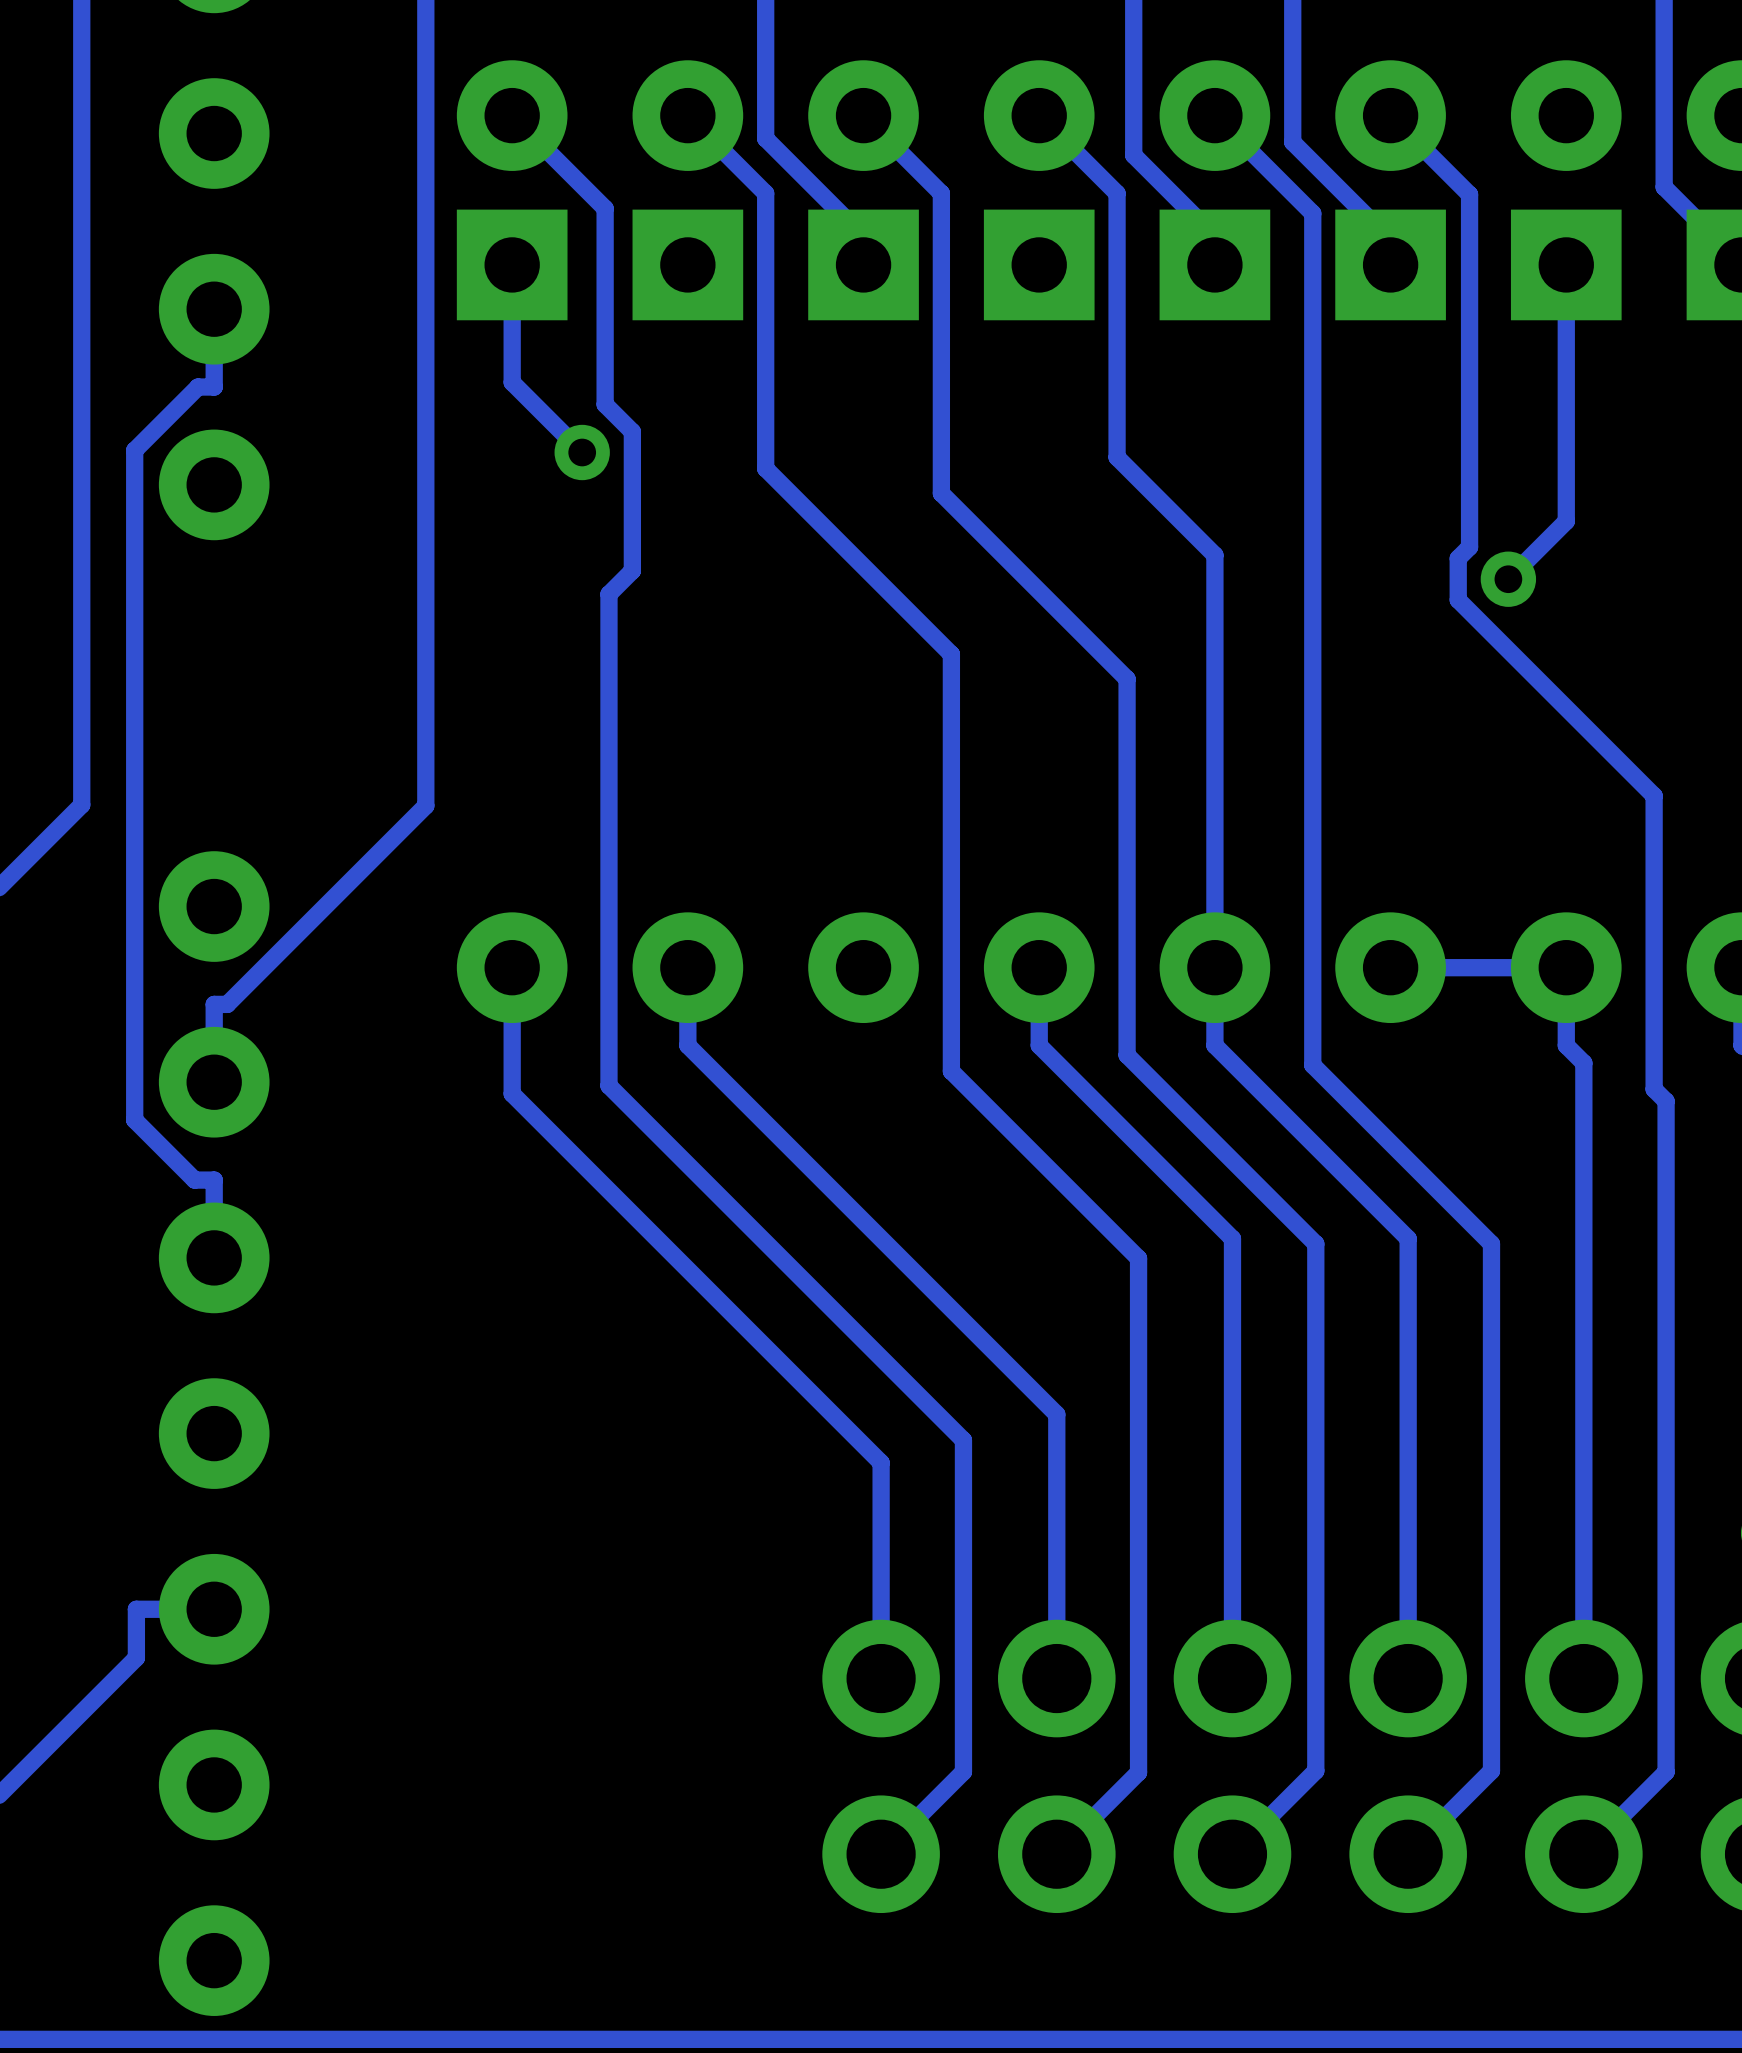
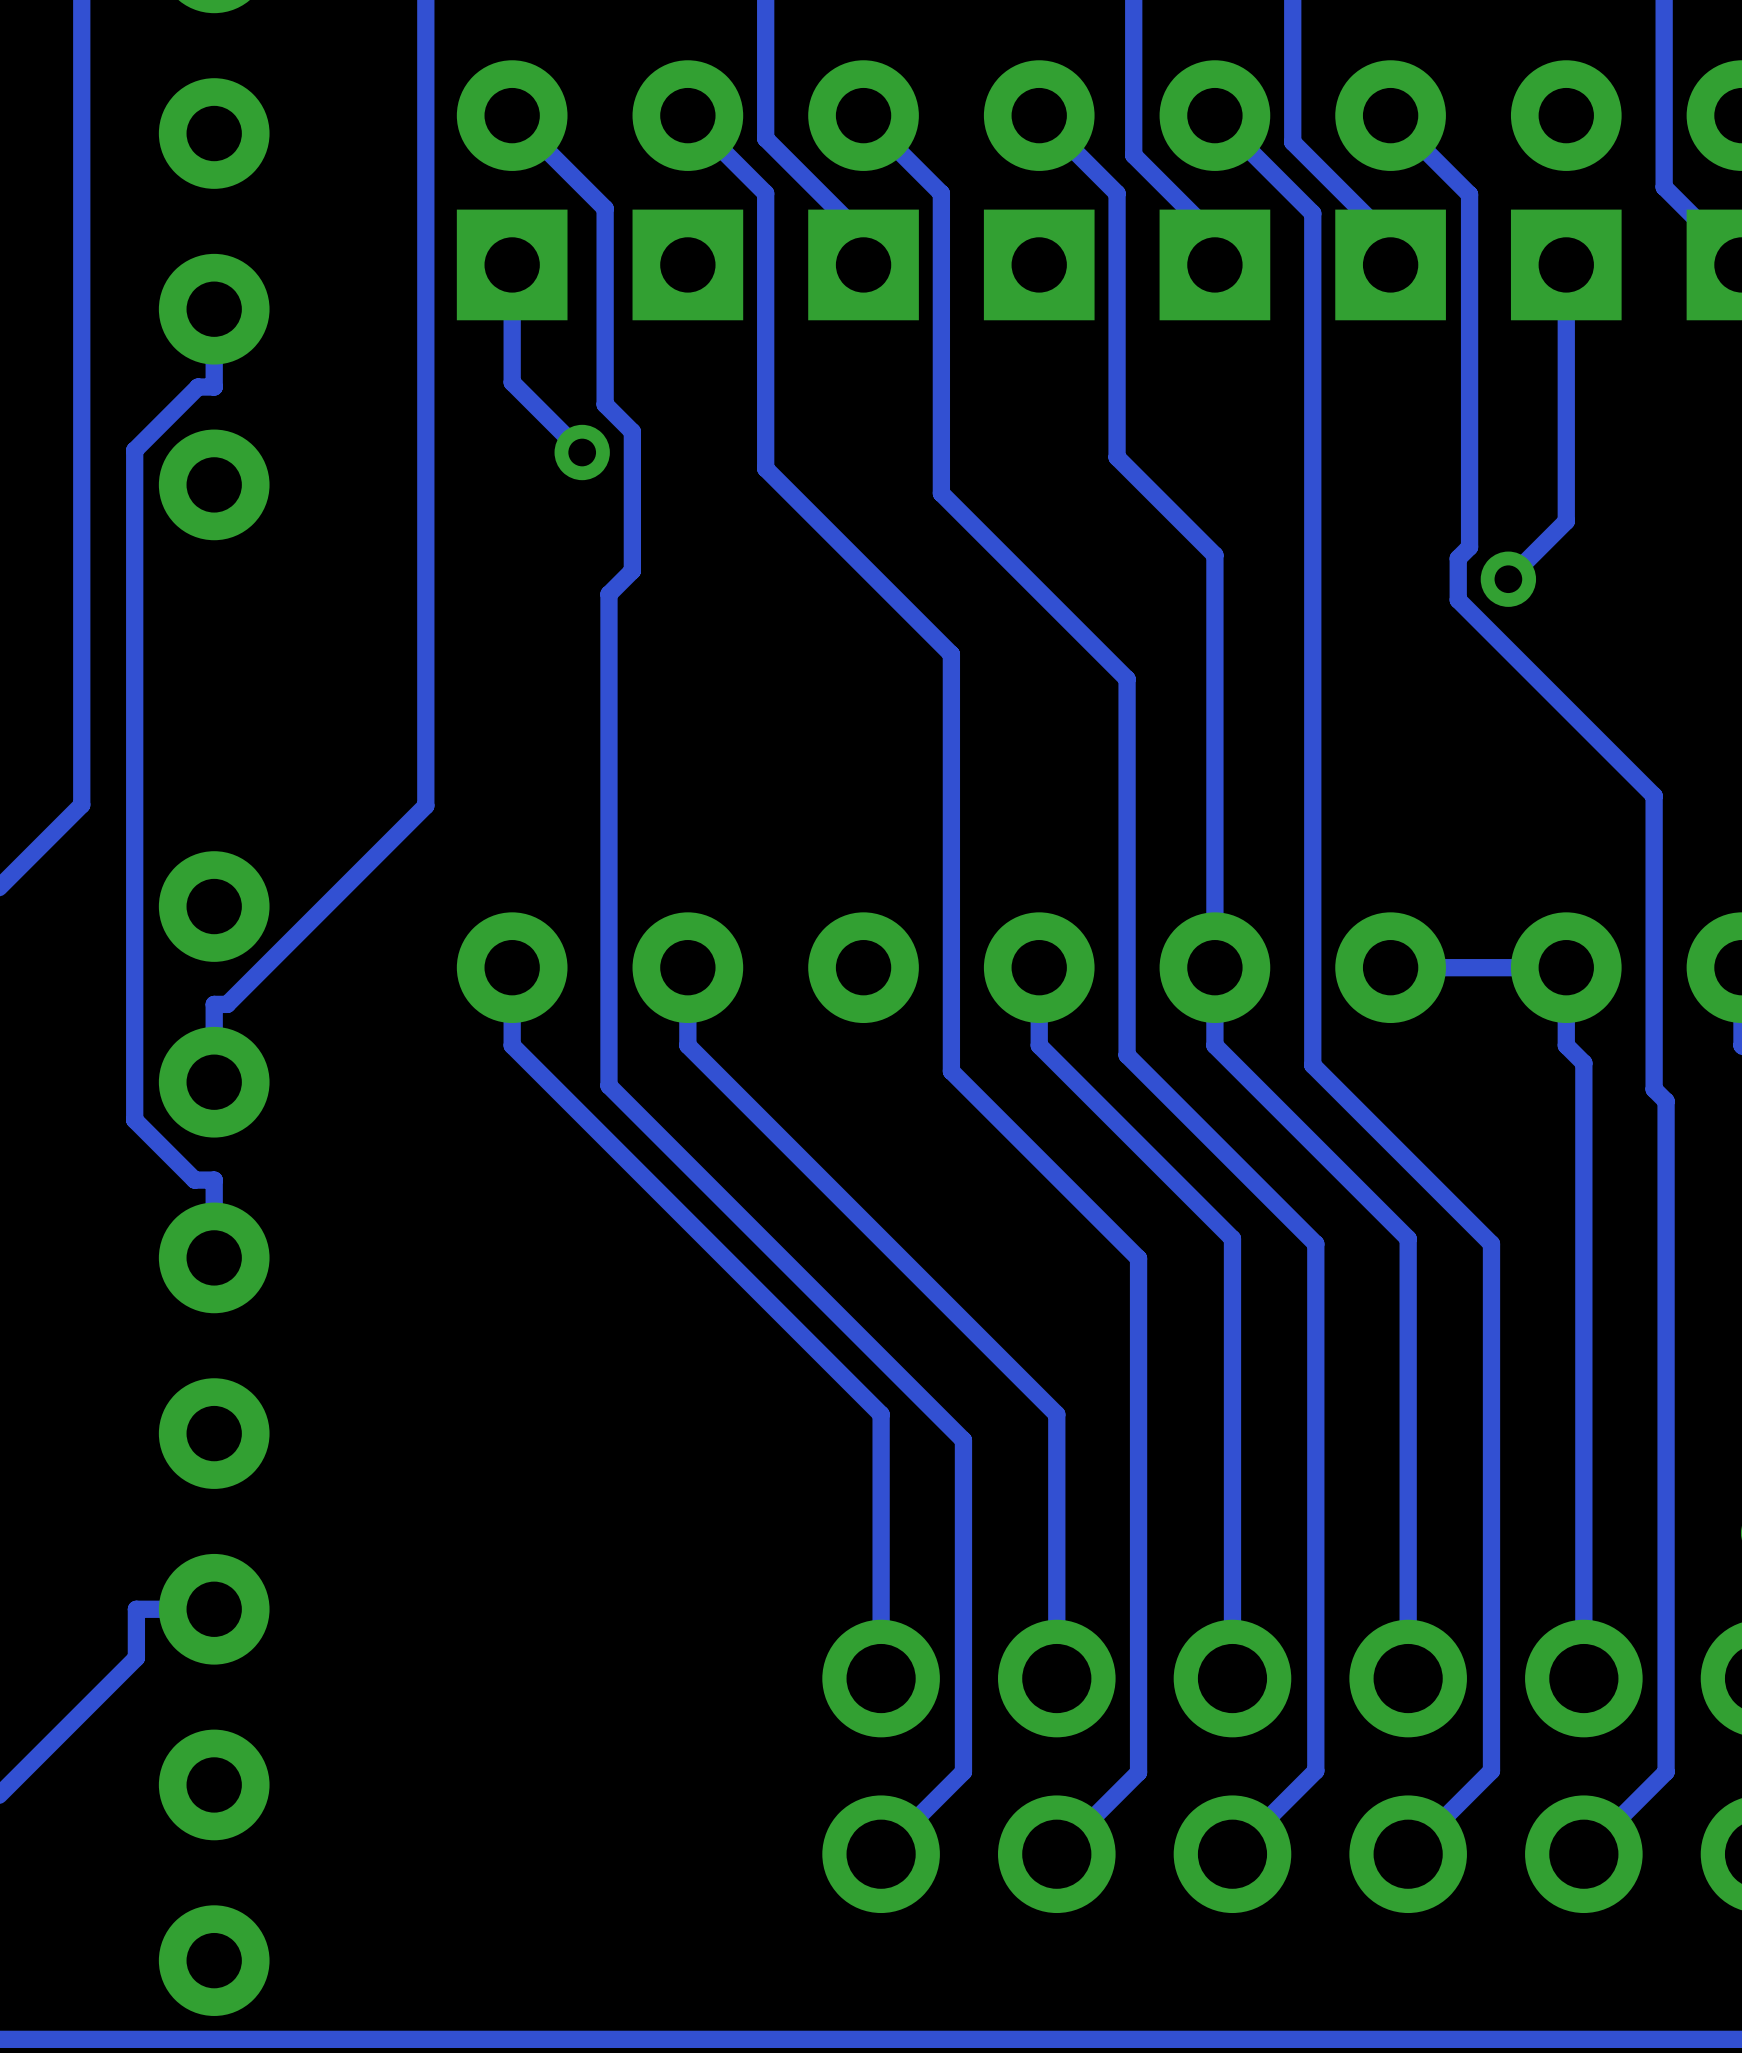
track: (512, 1045) (512, 1093) (881, 1462) -> (512, 1045) (881, 1414) (881, 1462)

